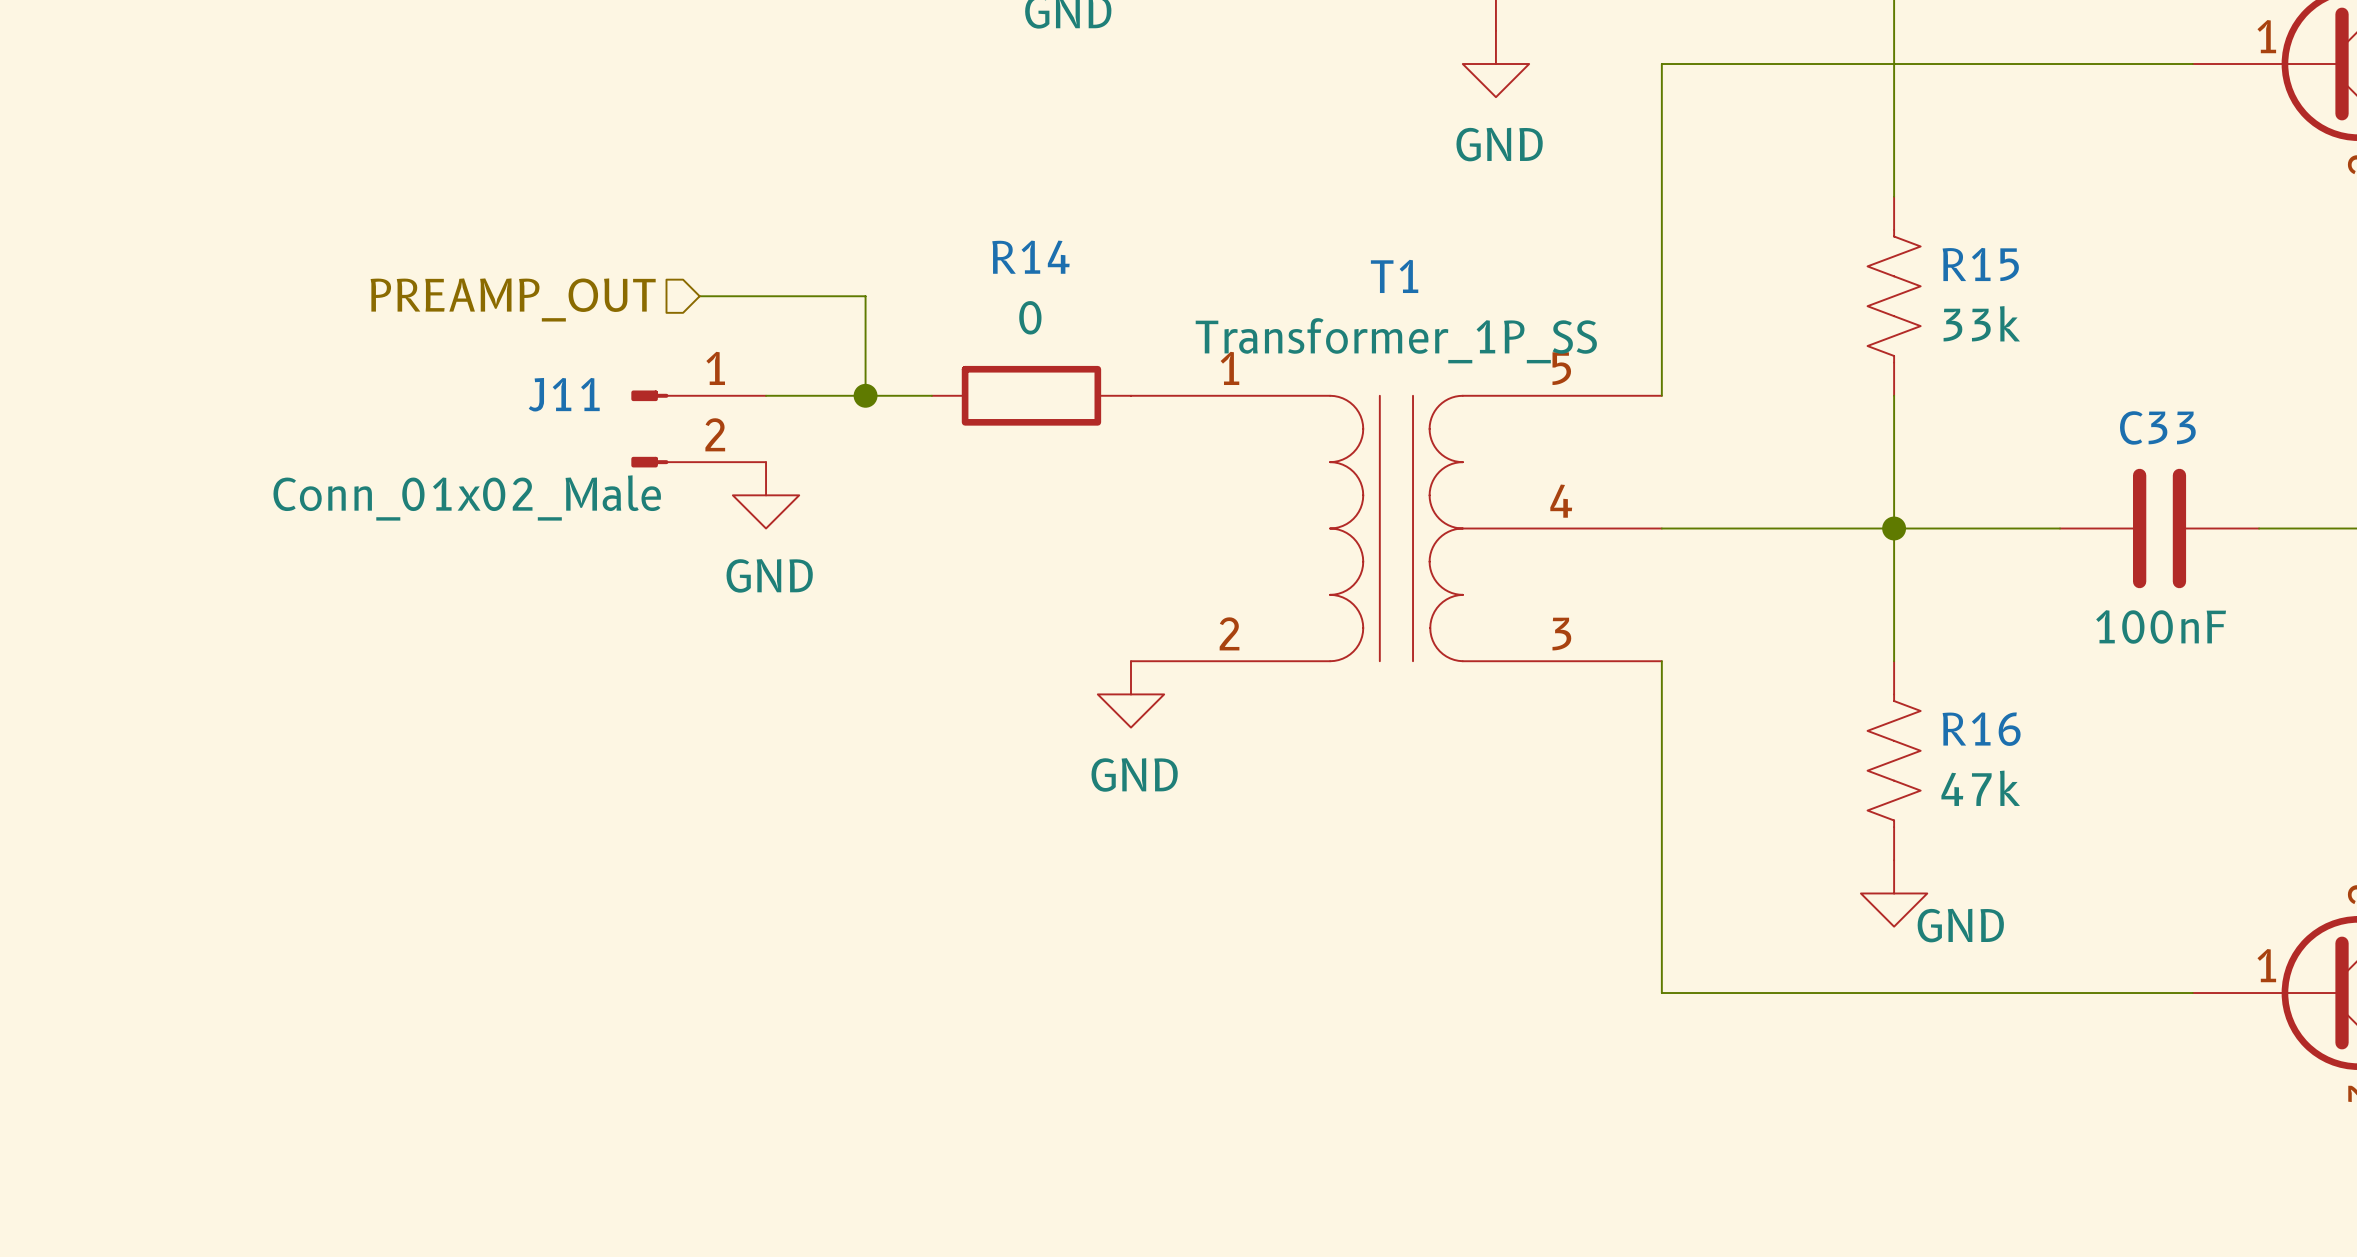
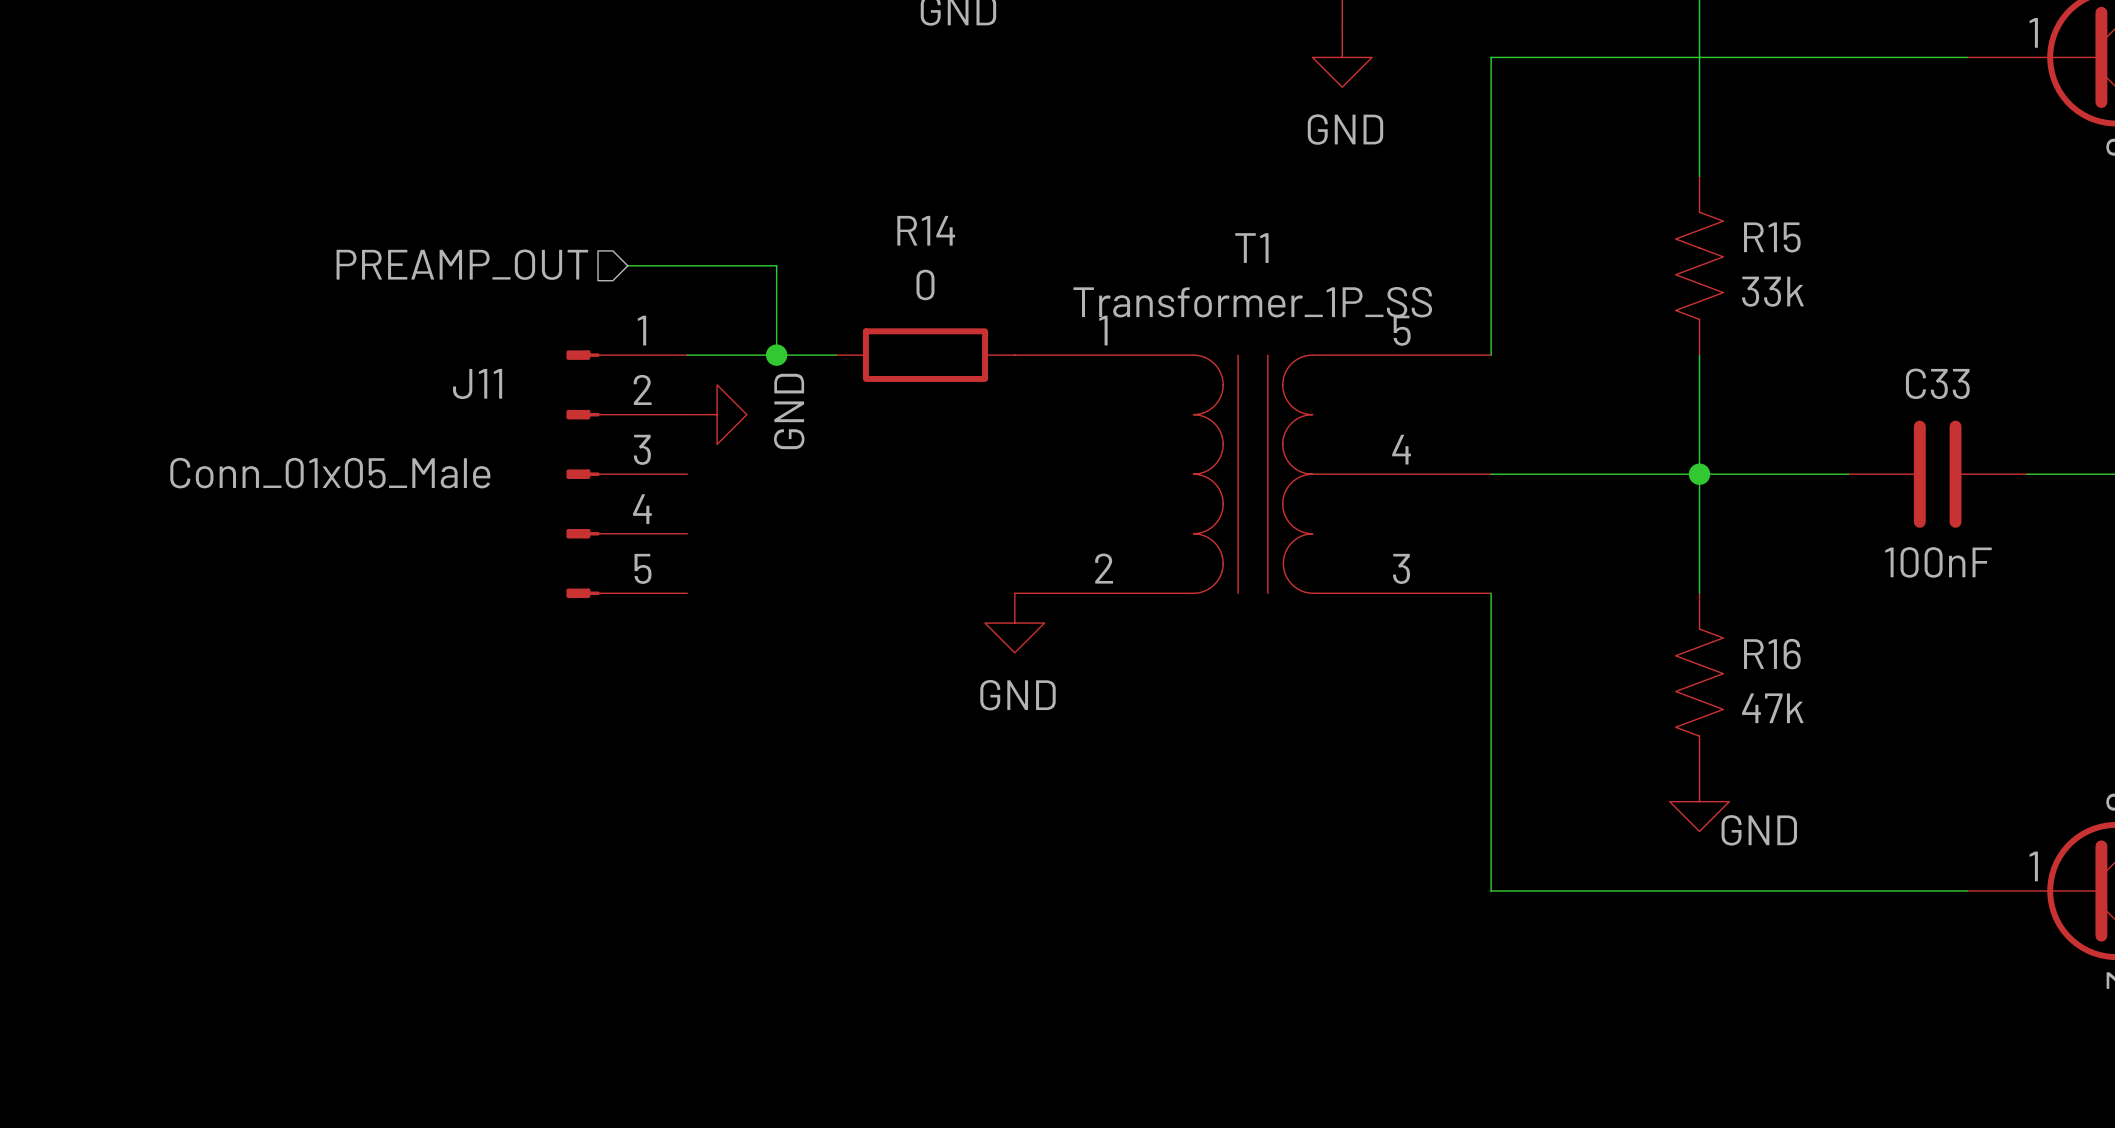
J11 symbol: [631, 390, 767, 468] -> [566, 350, 688, 599]
J11 name position: J11 (564, 394) -> J11 (477, 383)
power symbol rotation: 0° (766, 495) -> 90° counterclockwise (717, 414)
power symbol position: GND (766, 495) -> GND (717, 414)
J11 value: Conn_01x02_Male (467, 497) -> Conn_01x05_Male (330, 473)

